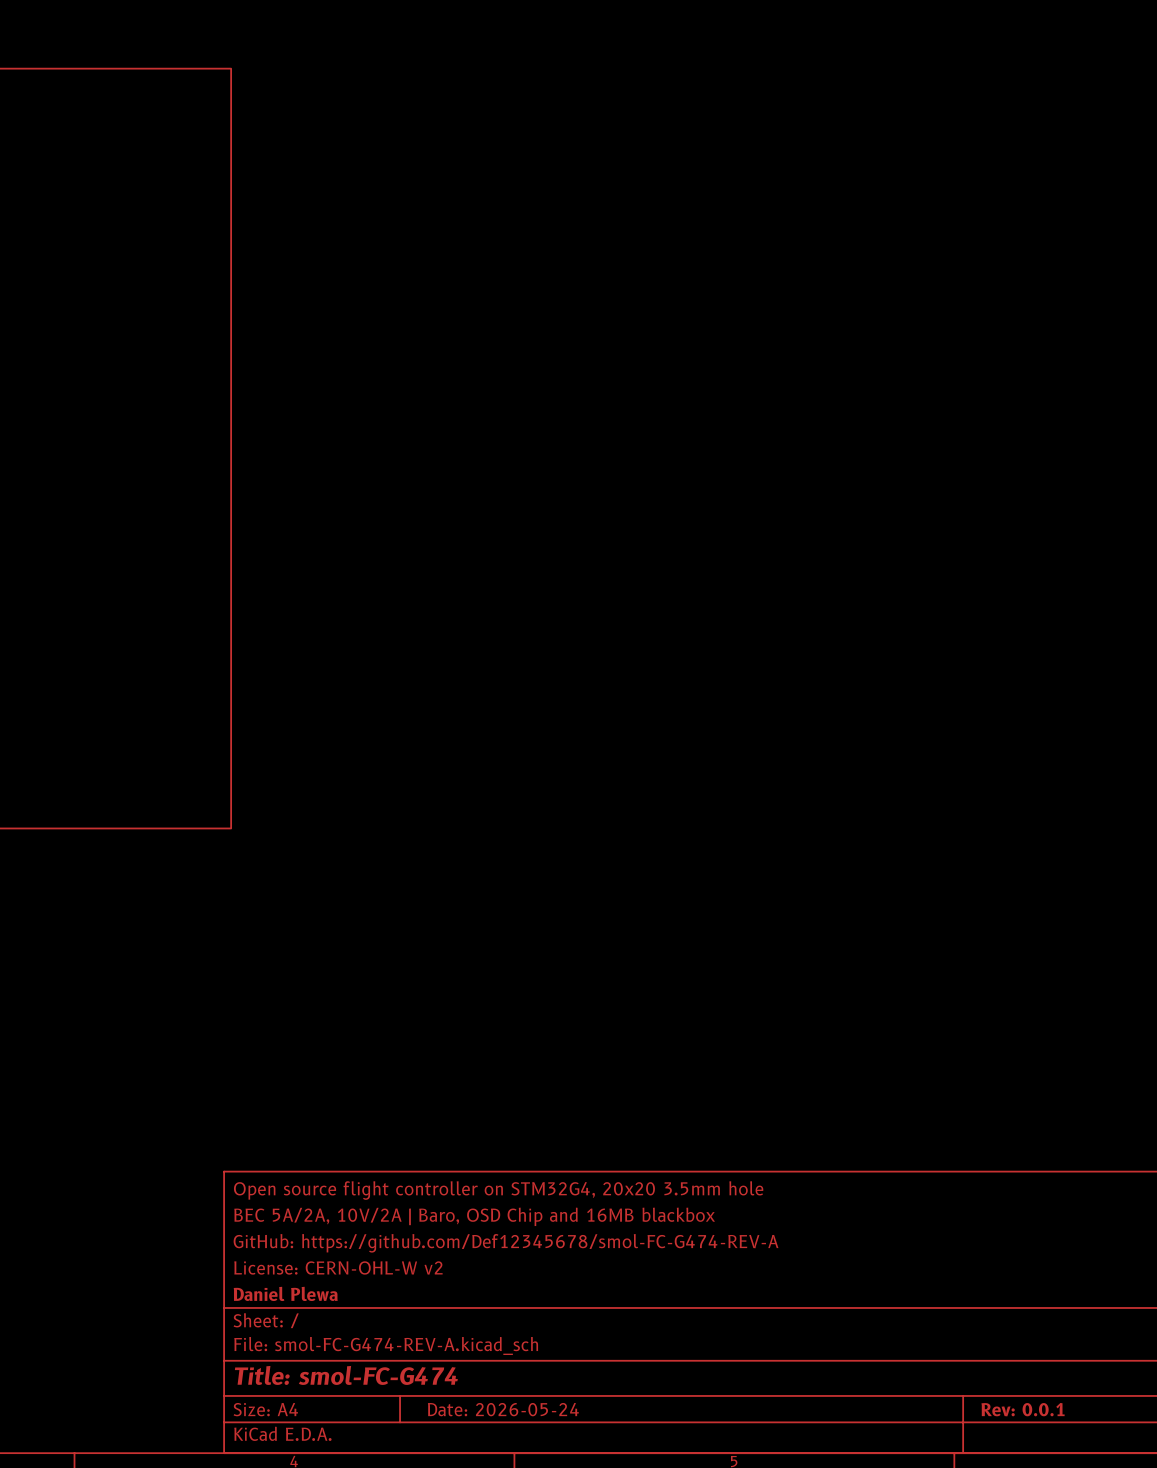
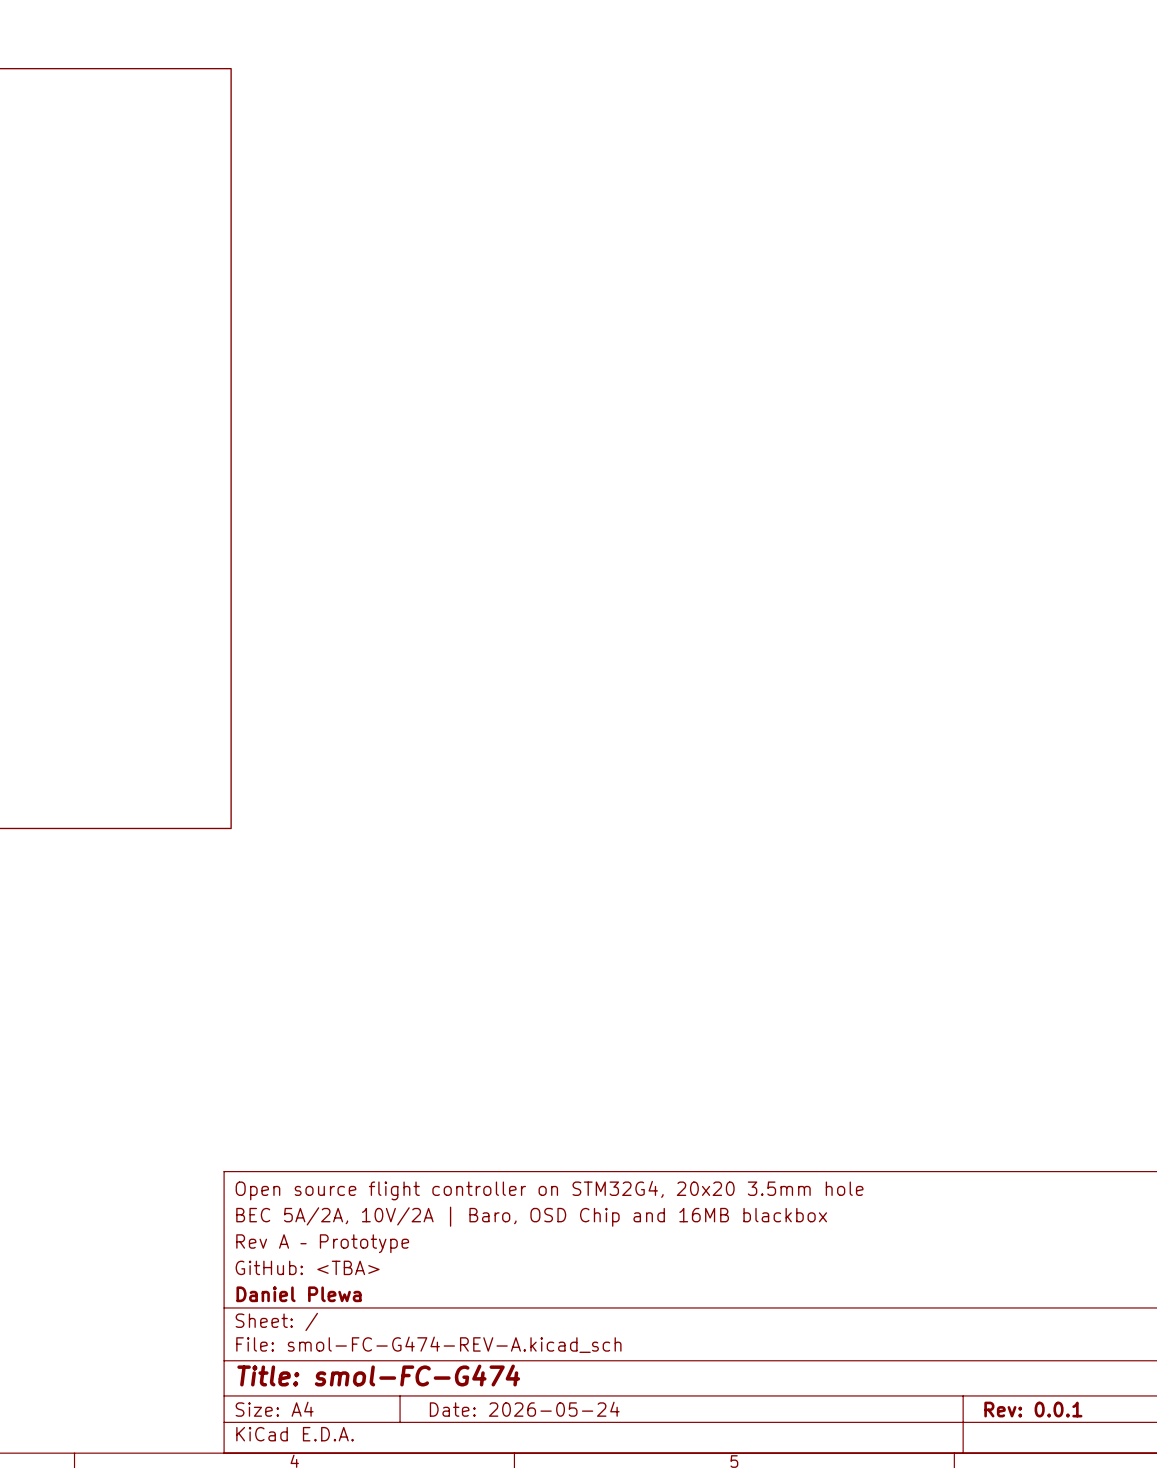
title block: GitHub: https://github.com/Def12345678/smol-FC-G474-REV-A (506, 1243) -> Rev A – Prototype (322, 1243)
title block: License: CERN-OHL-W v2 (338, 1267) -> GitHub: <TBA> (307, 1267)

